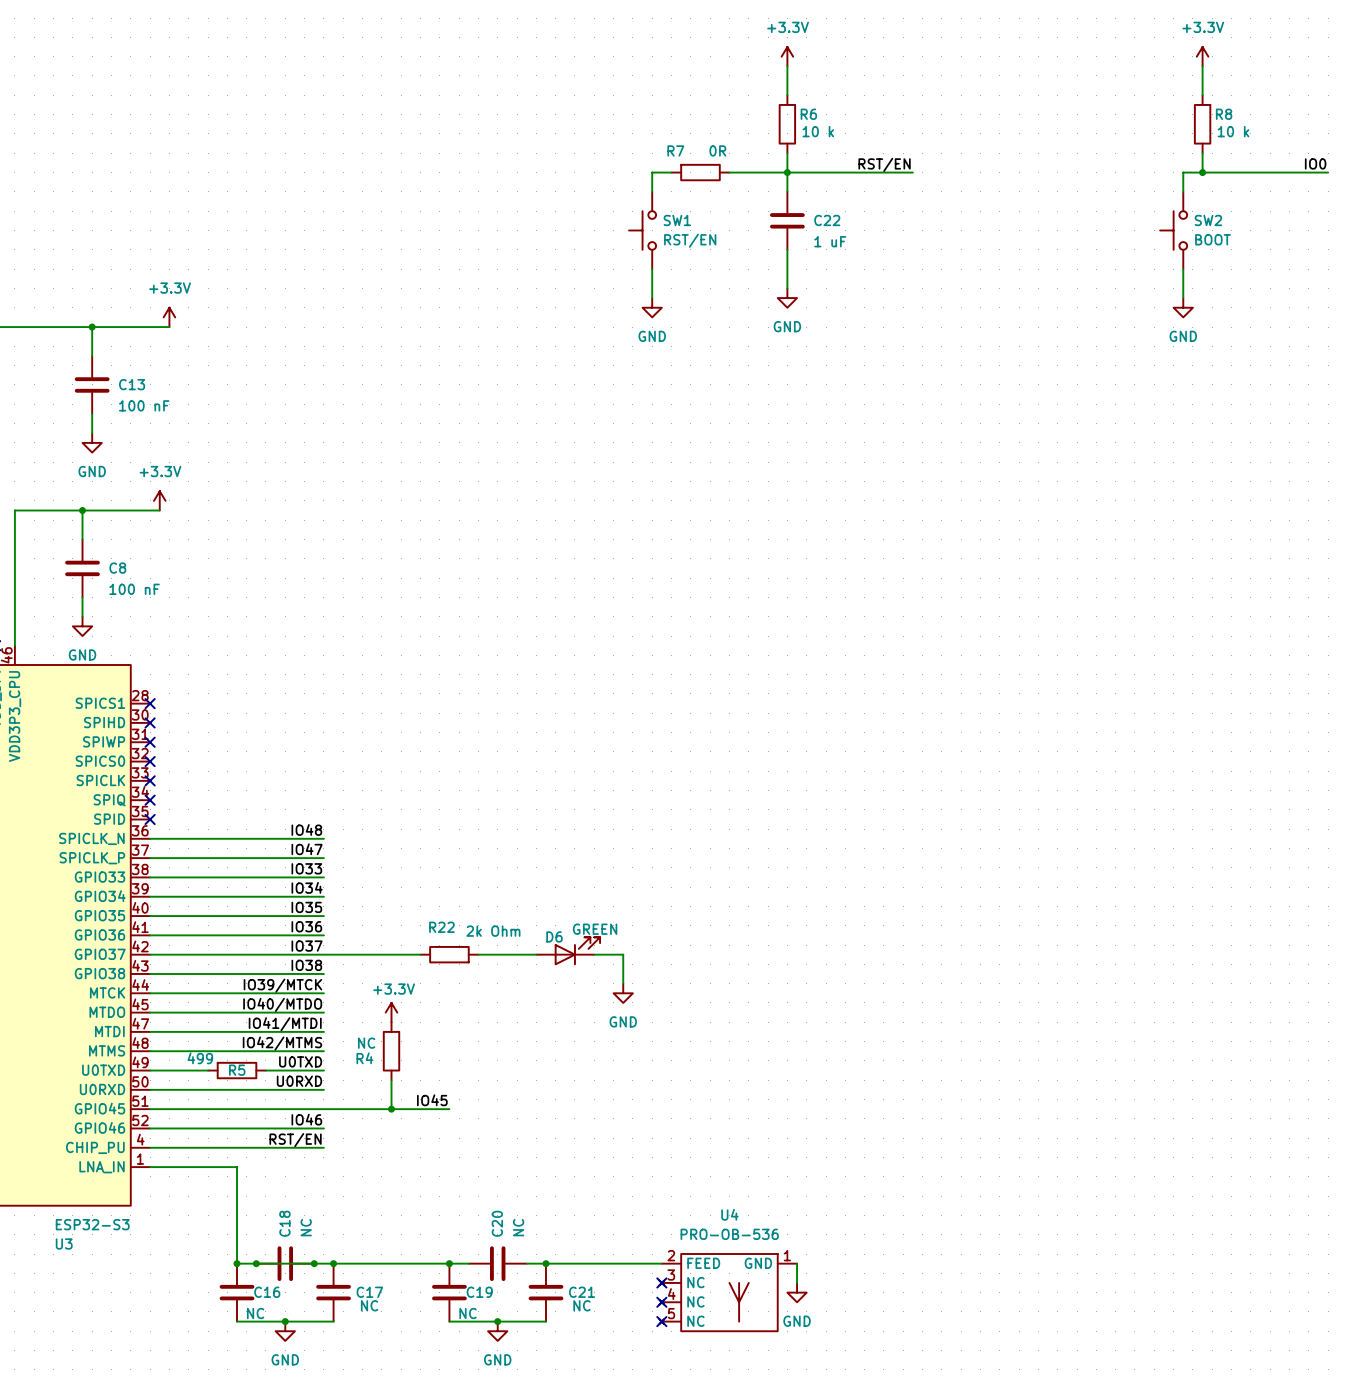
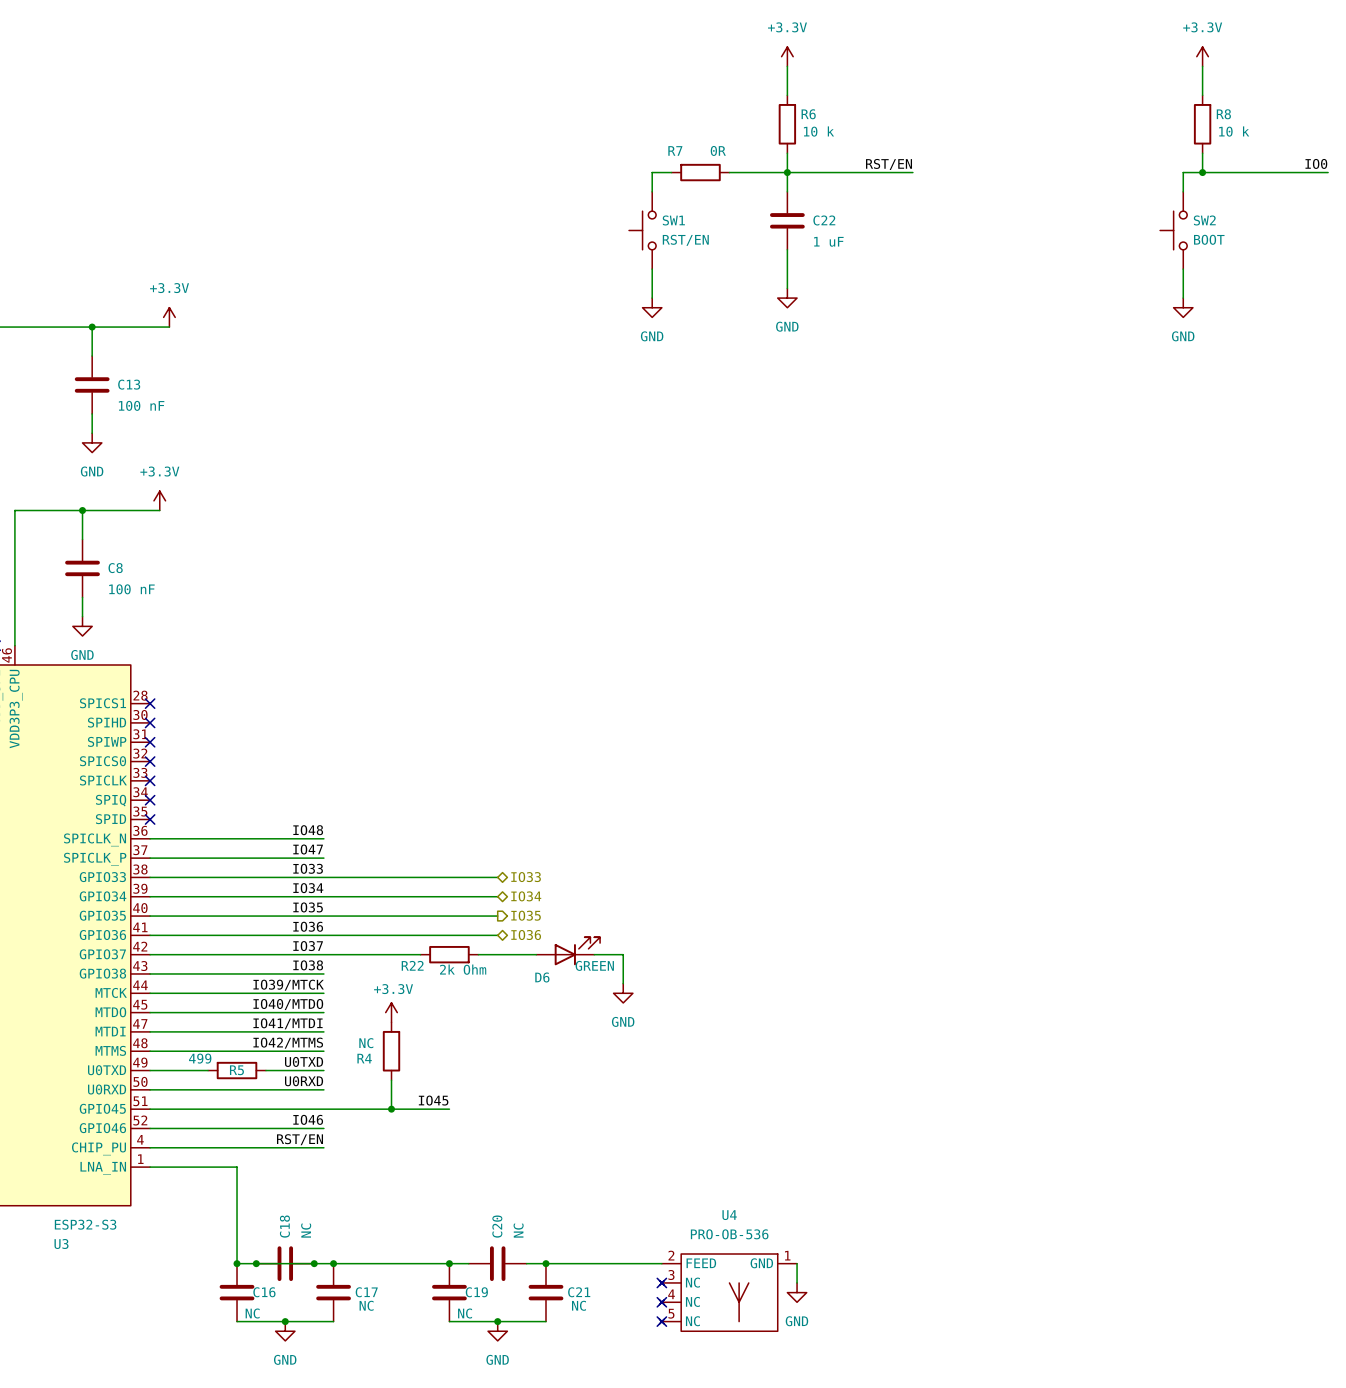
wire: none -> (323, 877) (497, 877)
hierarchical label: none -> IO33 (526, 877)
wire: none -> (323, 896) (497, 896)
hierarchical label: none -> IO34 (526, 896)
hierarchical label: none -> IO35 (526, 915)
wire: none -> (323, 916) (497, 916)
R22 name position: R22 (441, 927) -> R22 (412, 965)
D6 value position: GREEN (595, 929) -> GREEN (594, 965)
R22 value position: 2k Ohm (493, 931) -> 2k Ohm (463, 969)
wire: none -> (323, 935) (497, 935)
hierarchical label: none -> IO36 (526, 935)
D6 name position: D6 (554, 936) -> D6 (542, 977)

